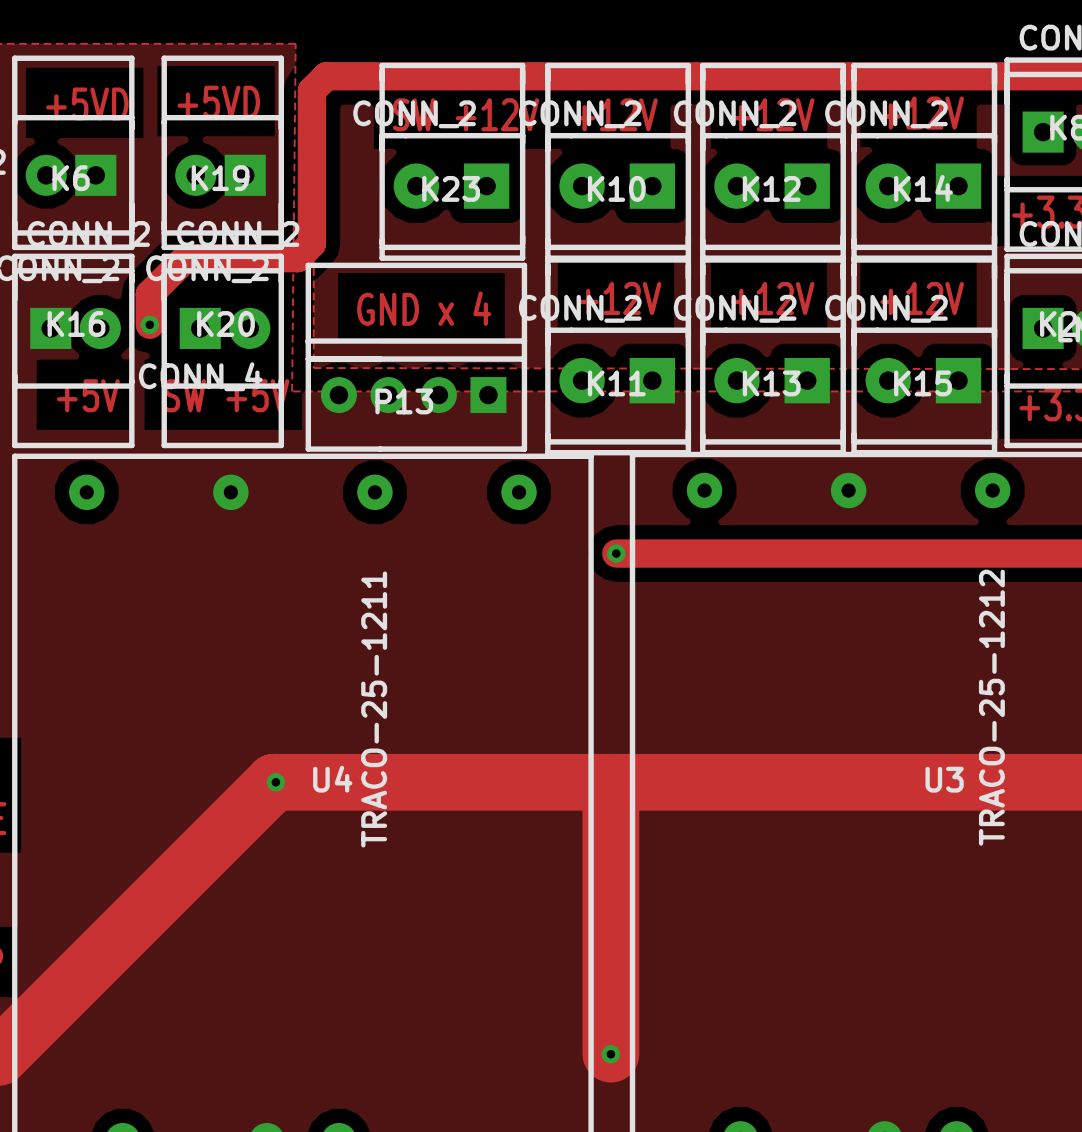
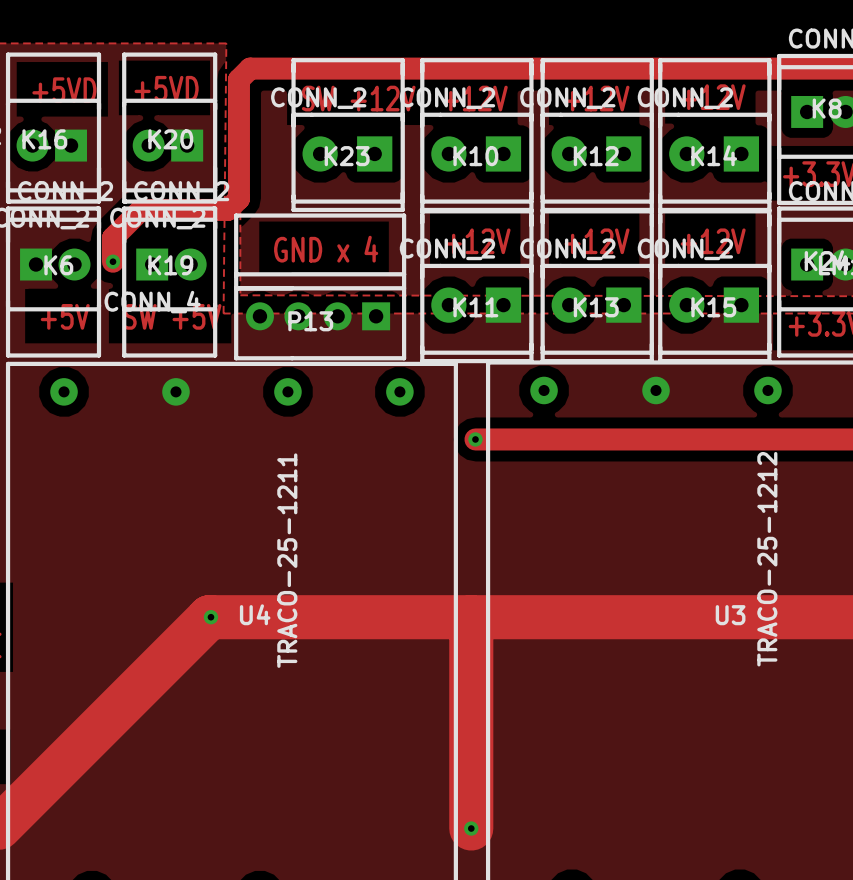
K6 name position: K6 (71, 178) -> K6 (58, 265)
K19 name position: K19 (220, 178) -> K19 (170, 265)
K16 name position: K16 (76, 324) -> K16 (44, 139)
K20 name position: K20 (225, 324) -> K20 (170, 139)

